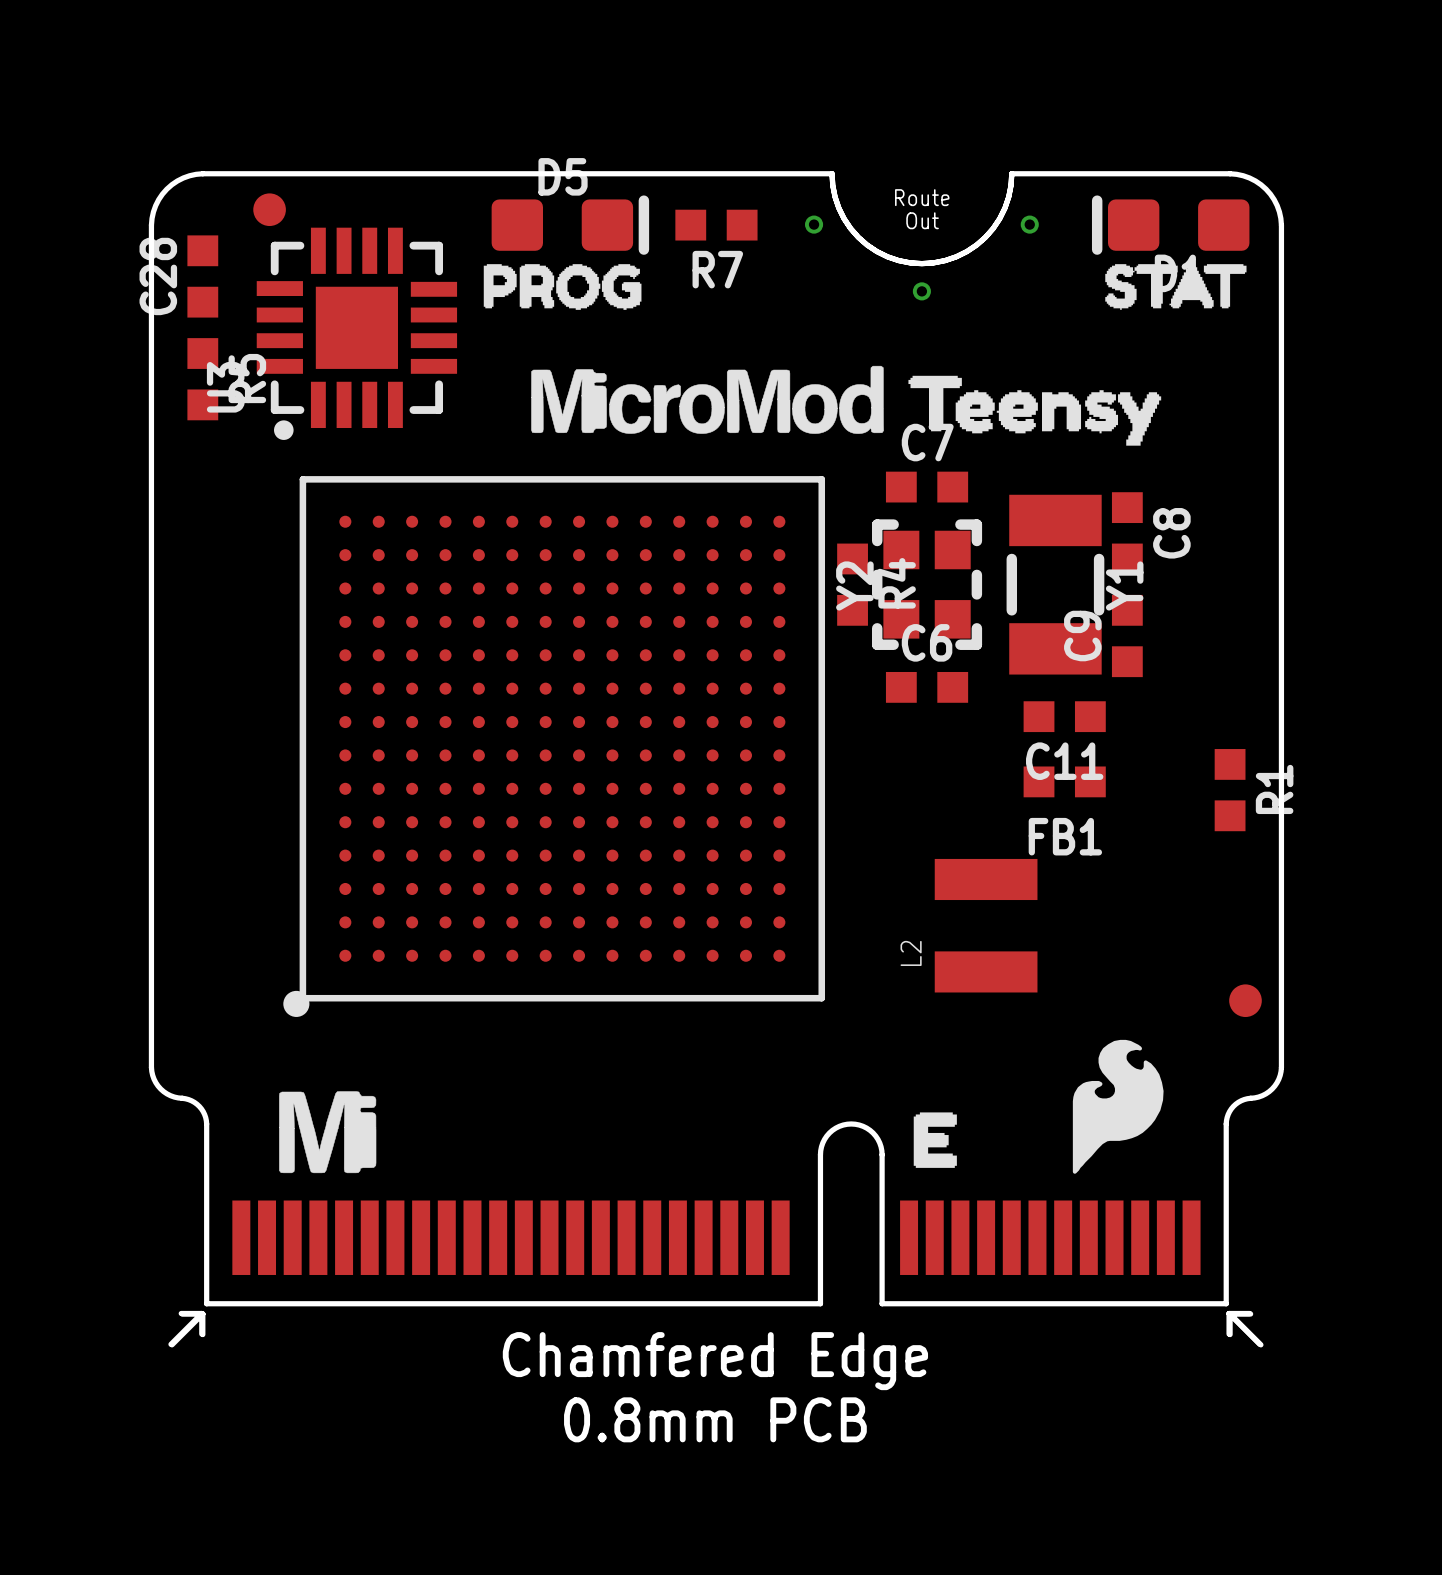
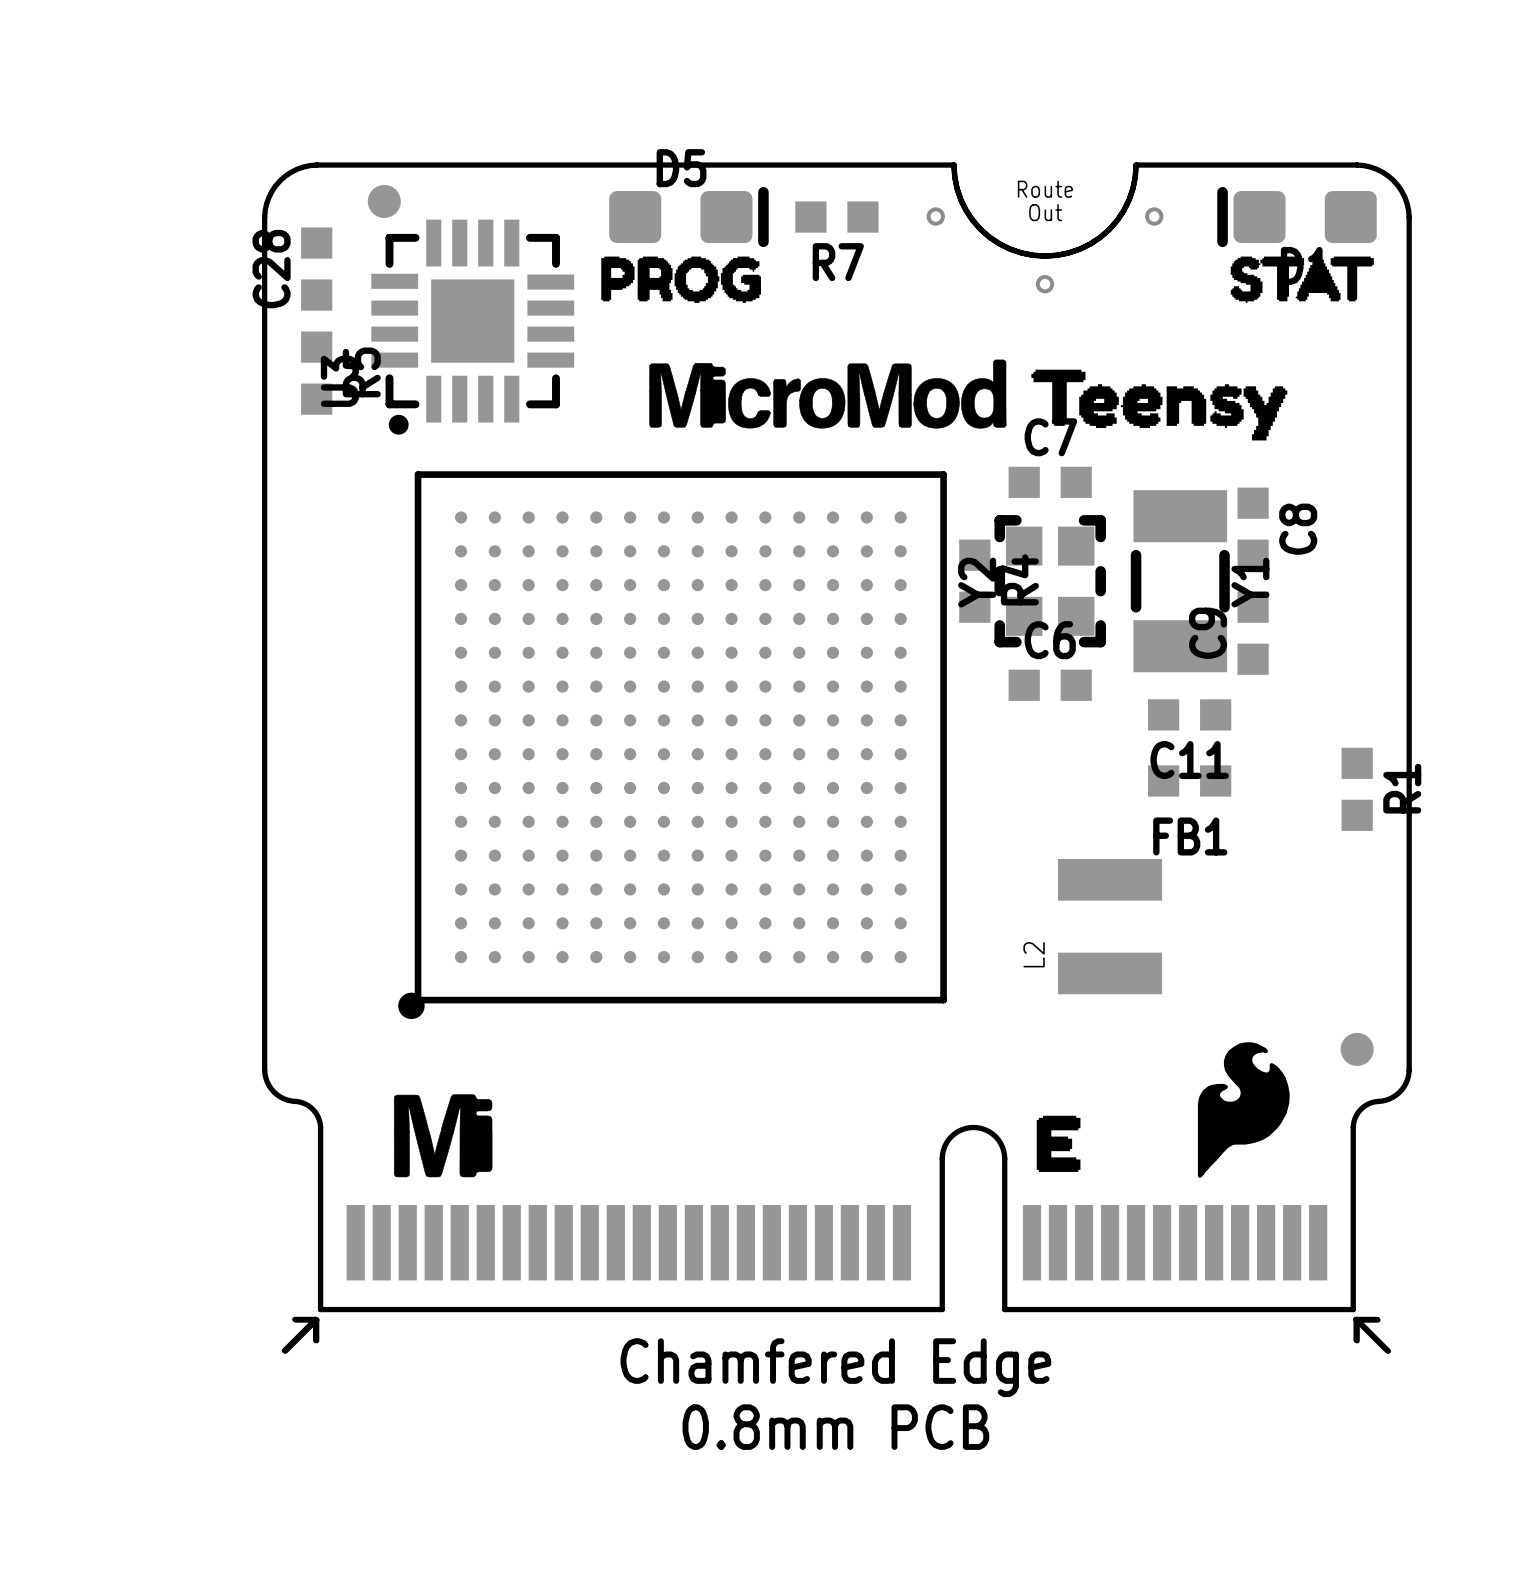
part position: (1245, 1000) -> (1357, 1049)

